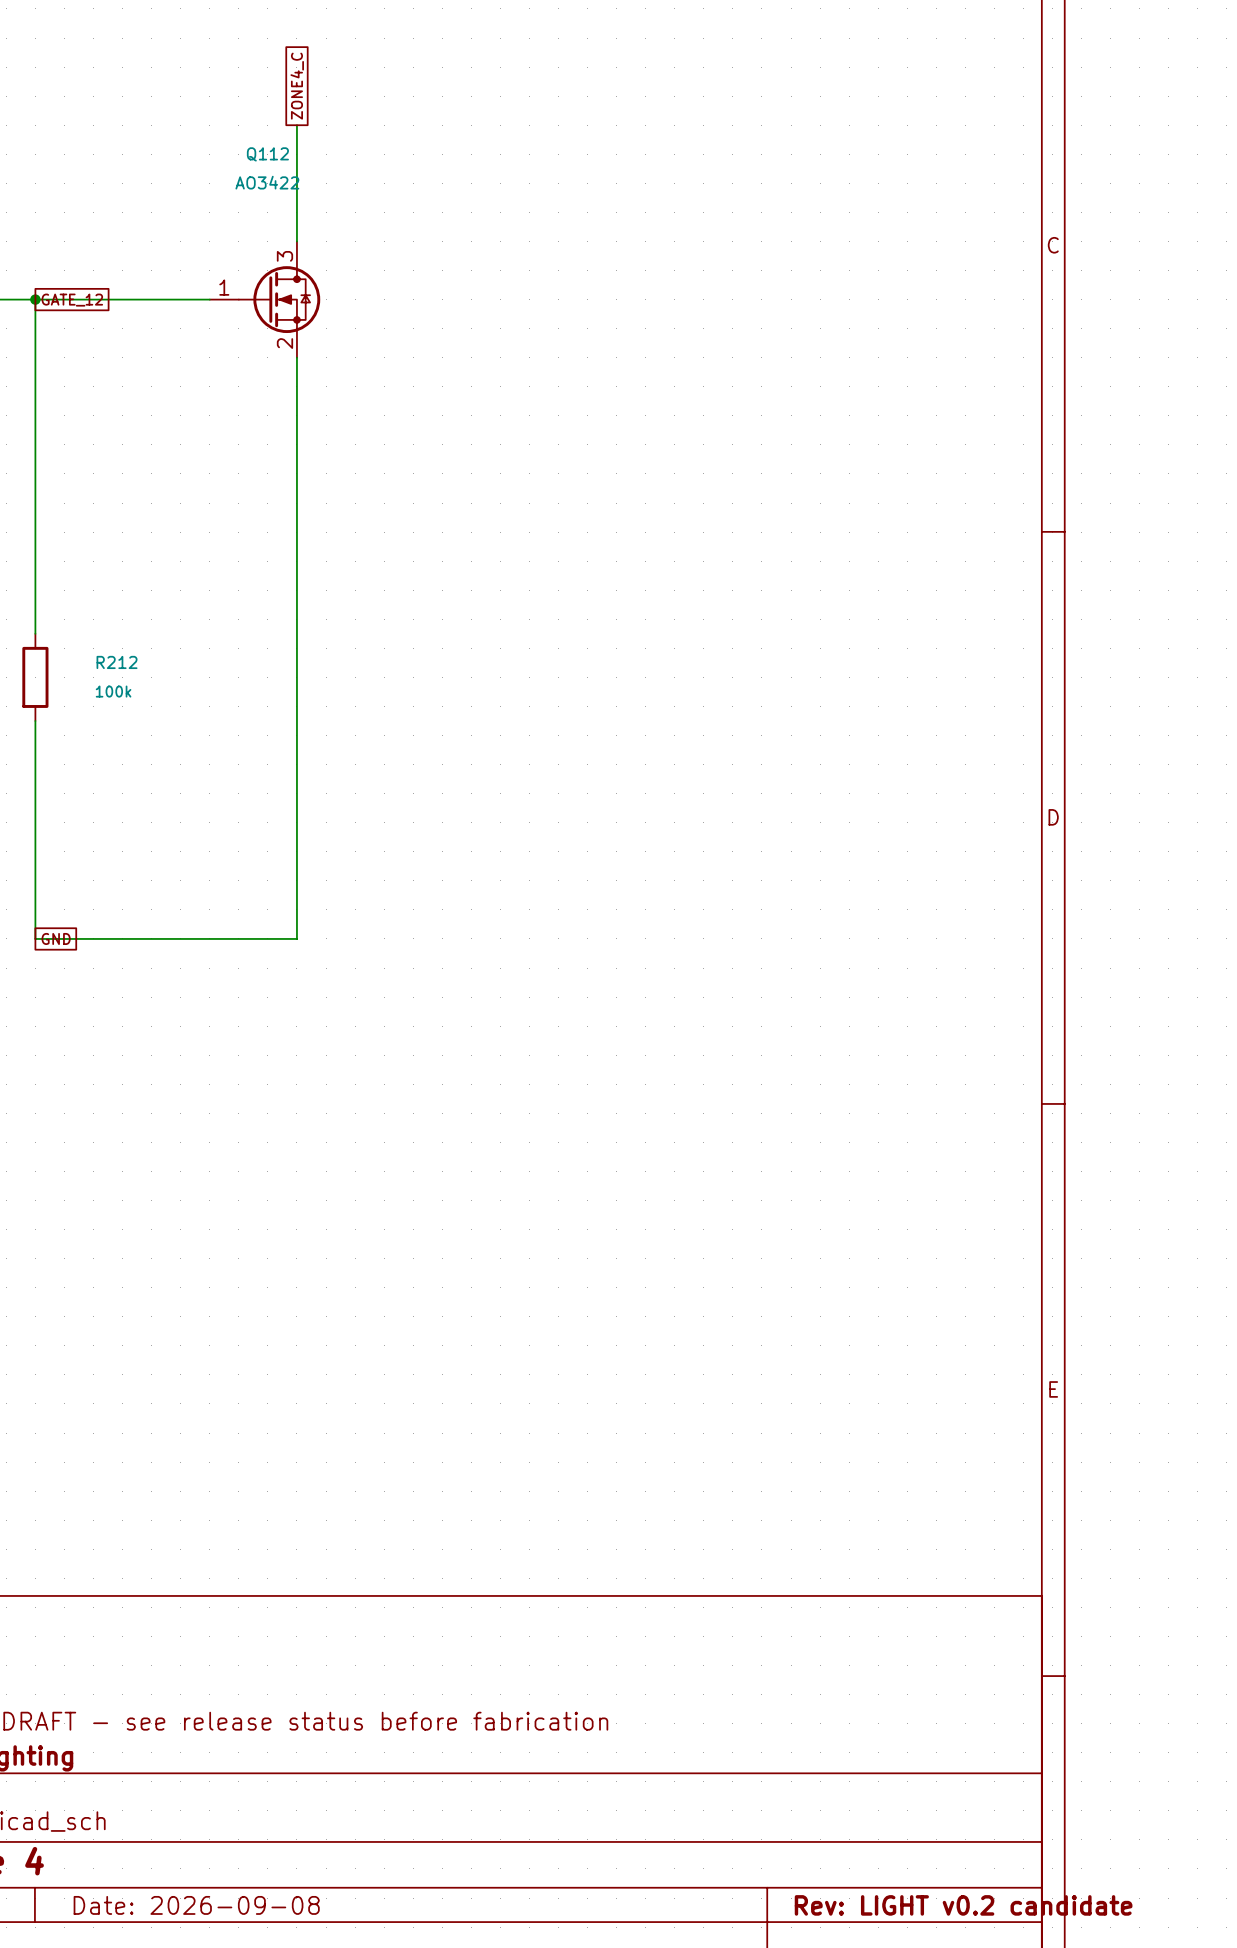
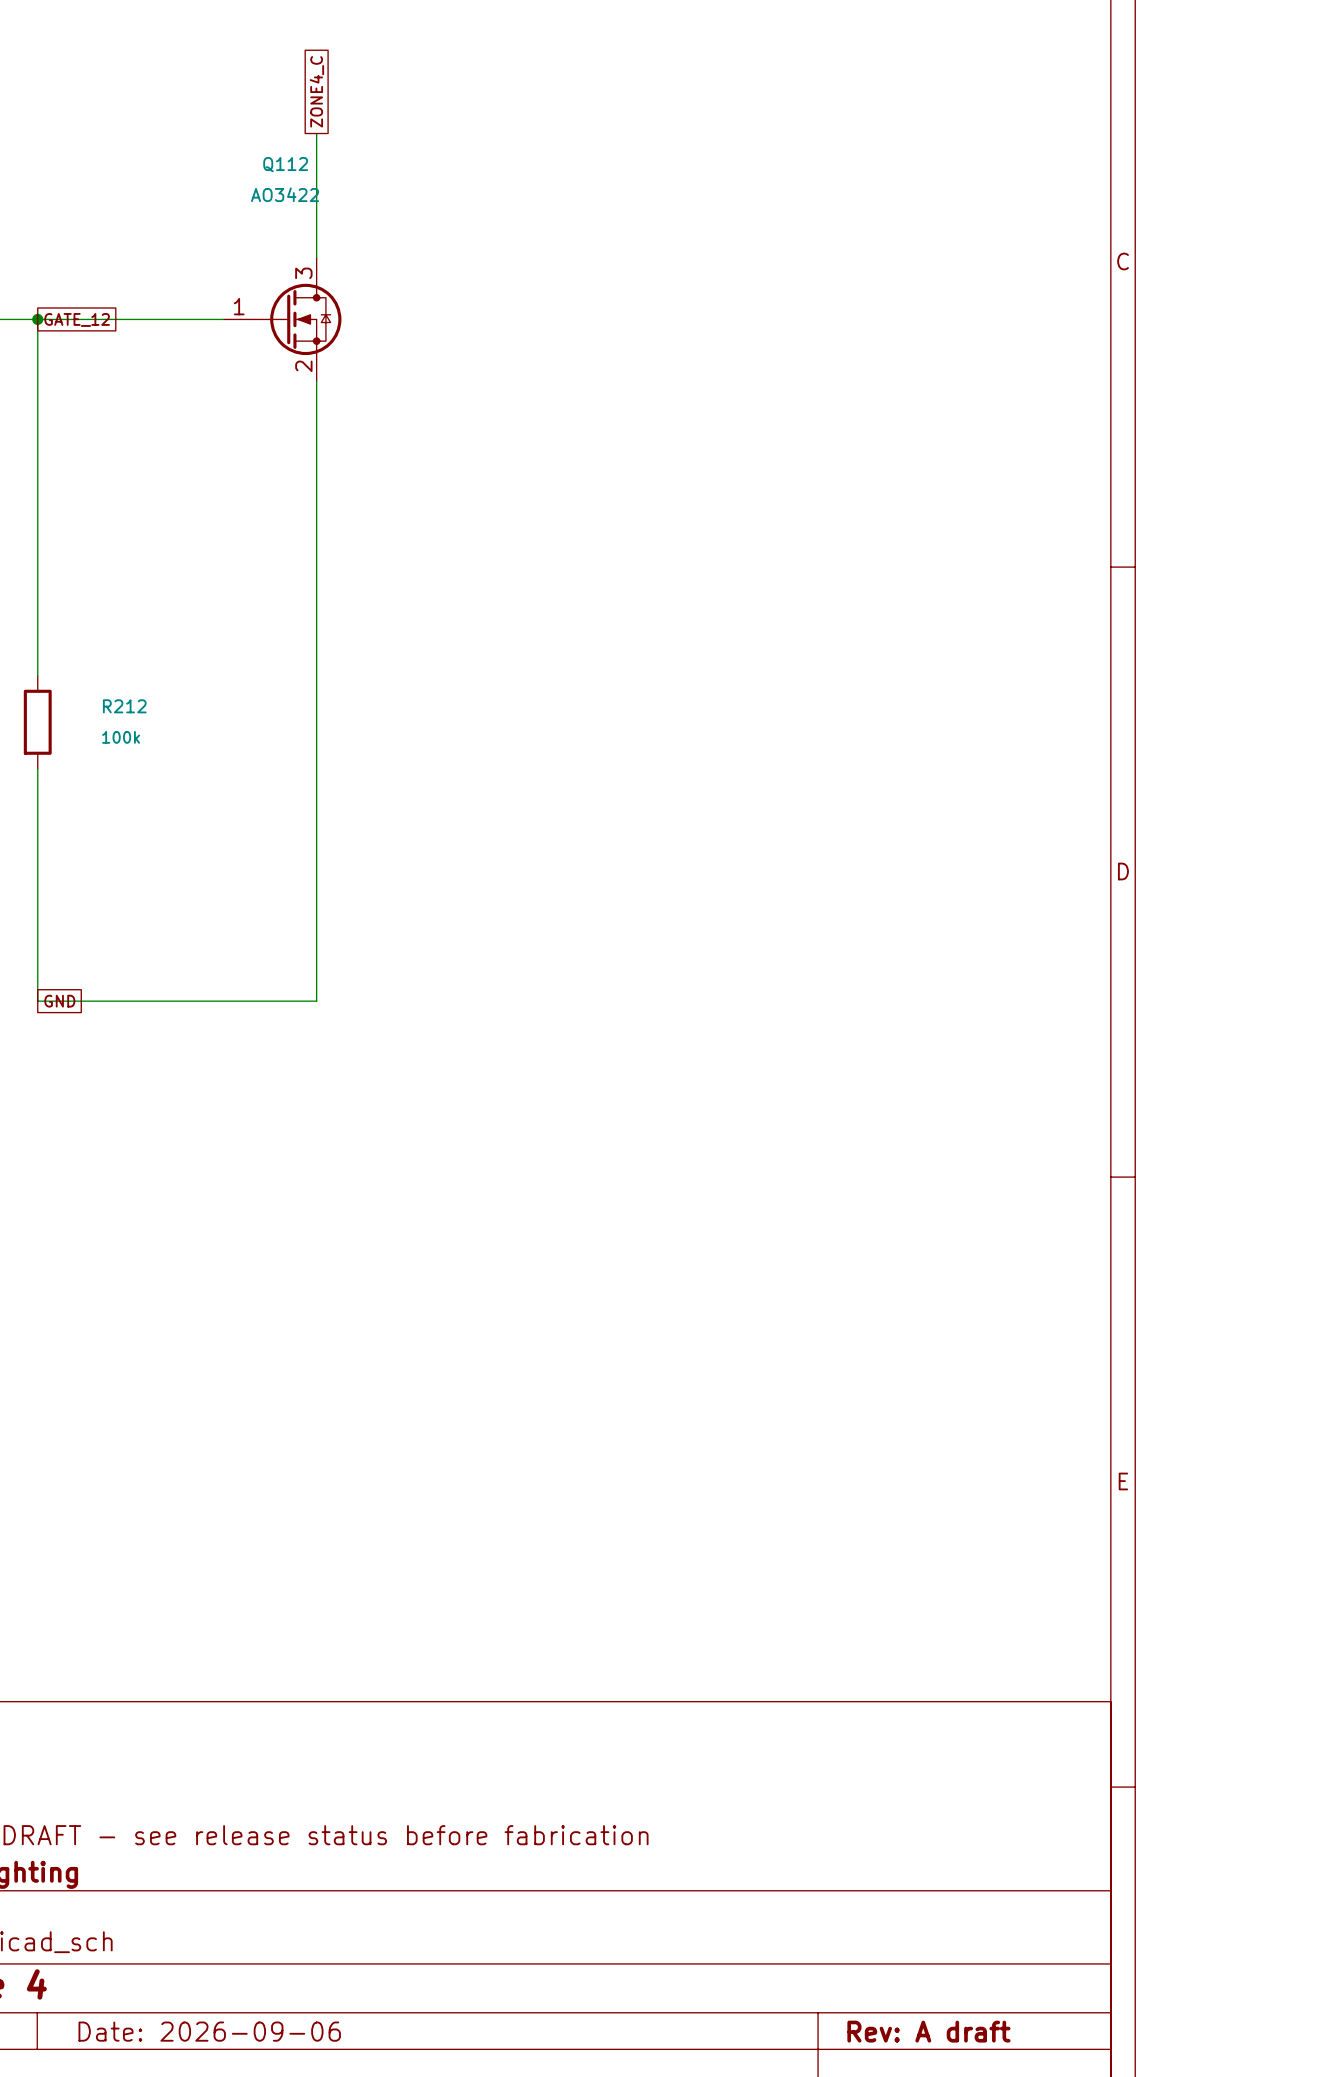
title block: Date: 2026-09-08 (196, 1905) -> Date: 2026-09-06 (209, 2031)
title block: Rev: LIGHT v0.2 candidate (963, 1905) -> Rev: A draft (928, 2031)

